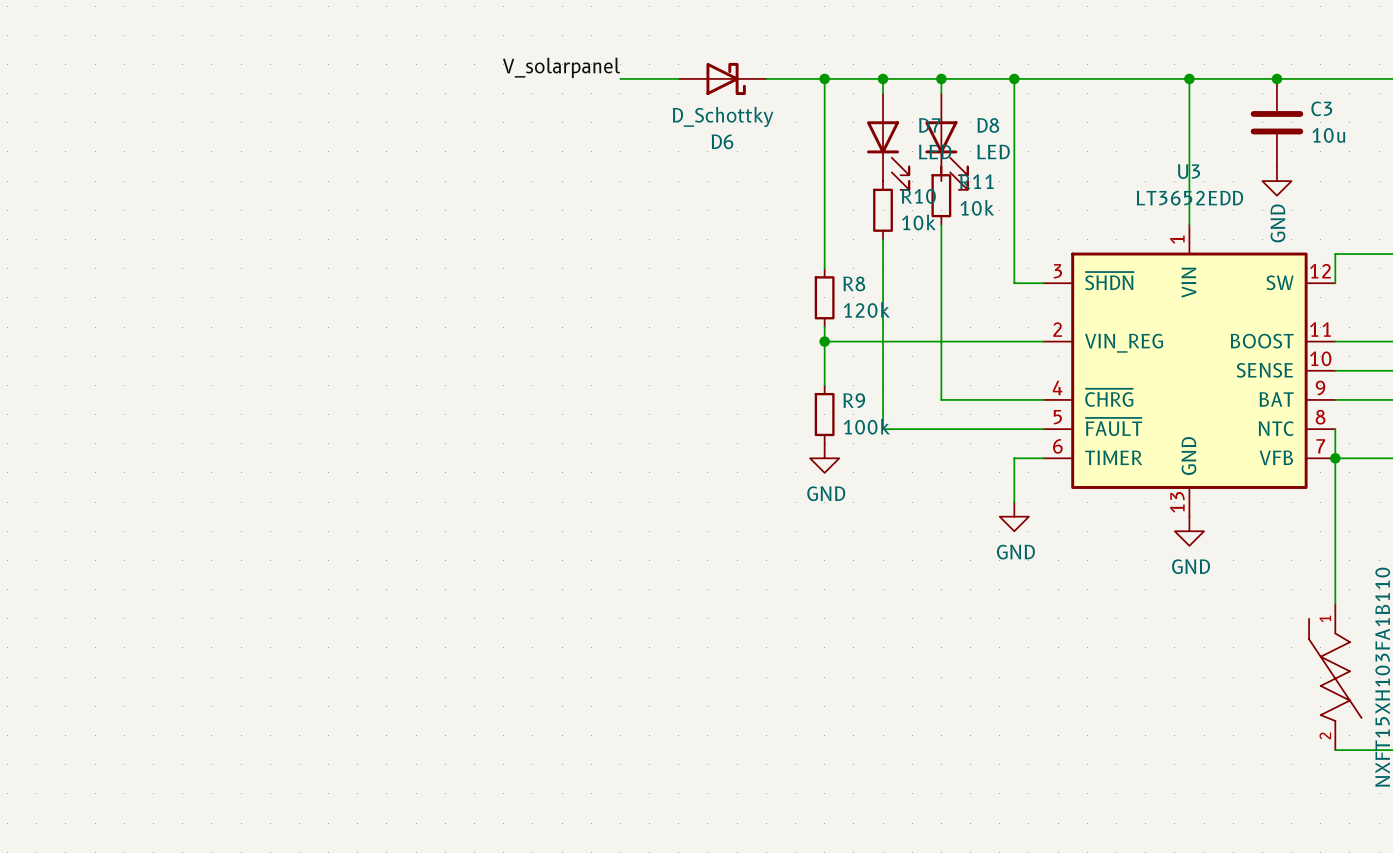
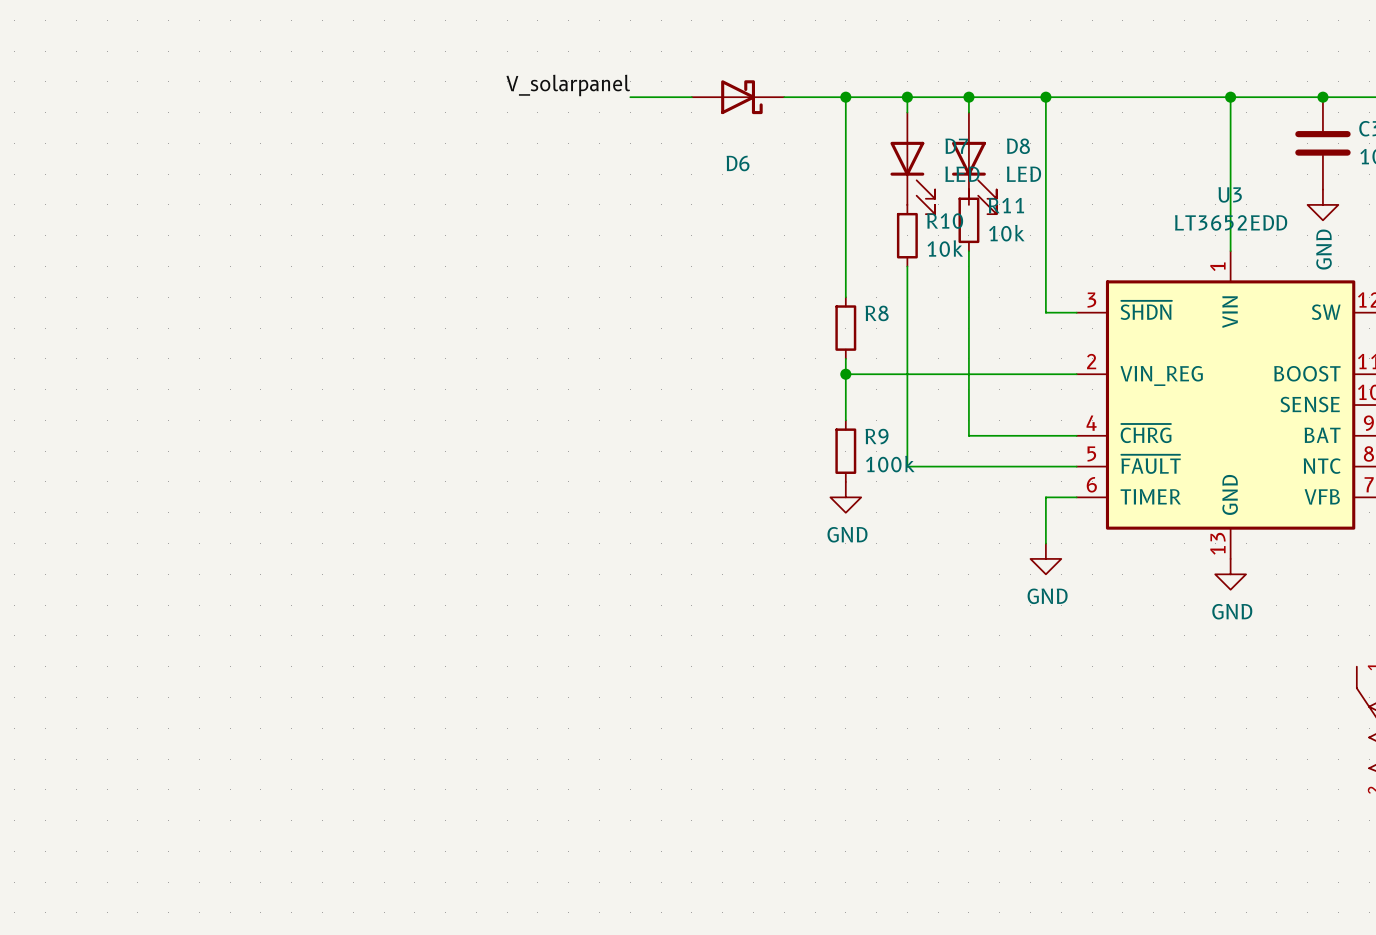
D6 value: D_Schottky (723, 117) -> none
R8 value: 120k (866, 310) -> none

